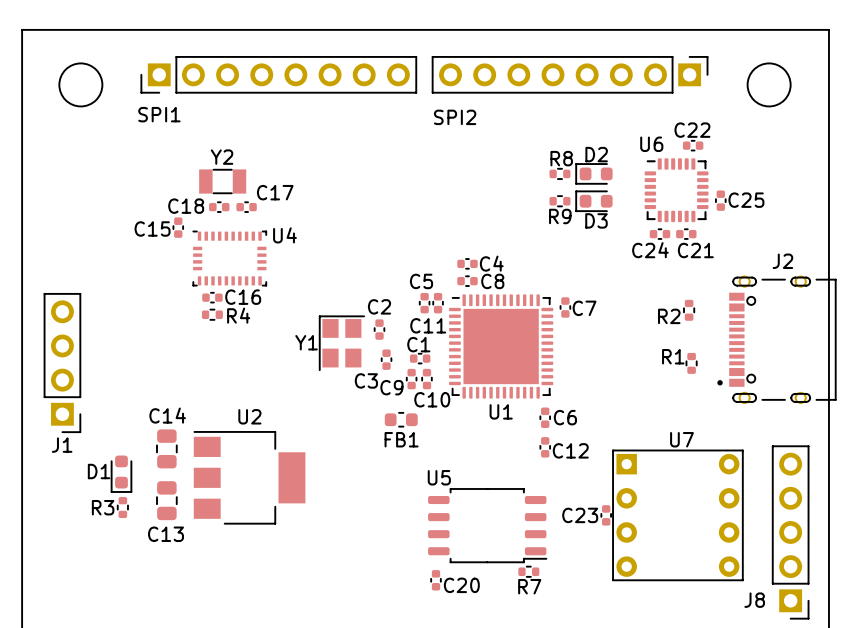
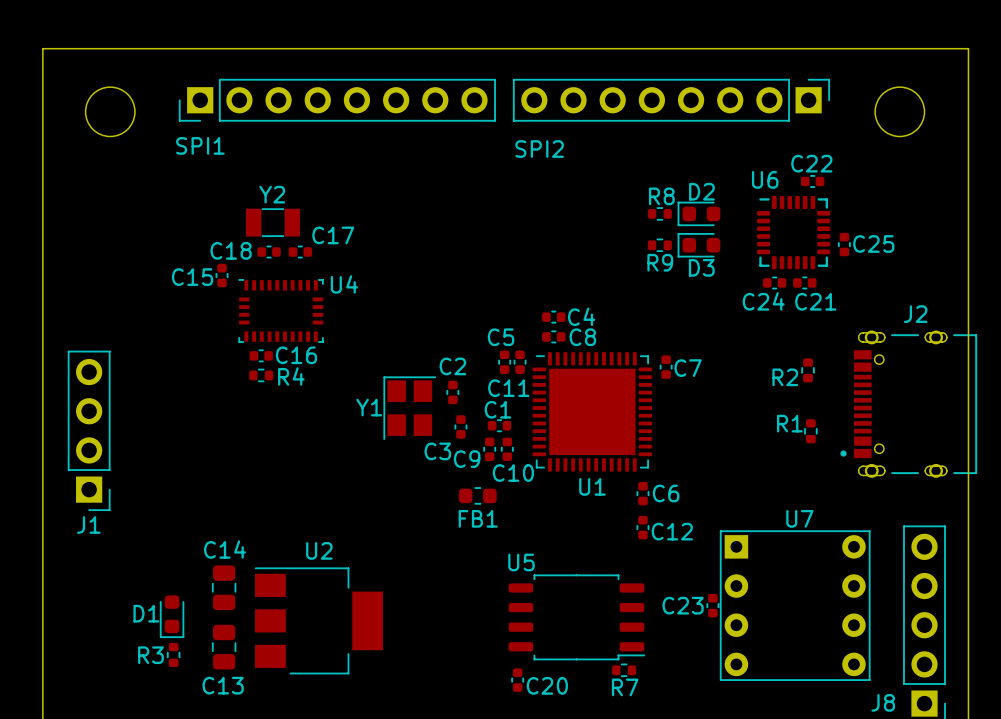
C14 position: (166, 448) -> (224, 587)
D1 position: (121, 474) -> (172, 616)
U2 position: (249, 477) -> (318, 620)
C13 position: (166, 500) -> (224, 647)
R3 position: (122, 507) -> (173, 654)

